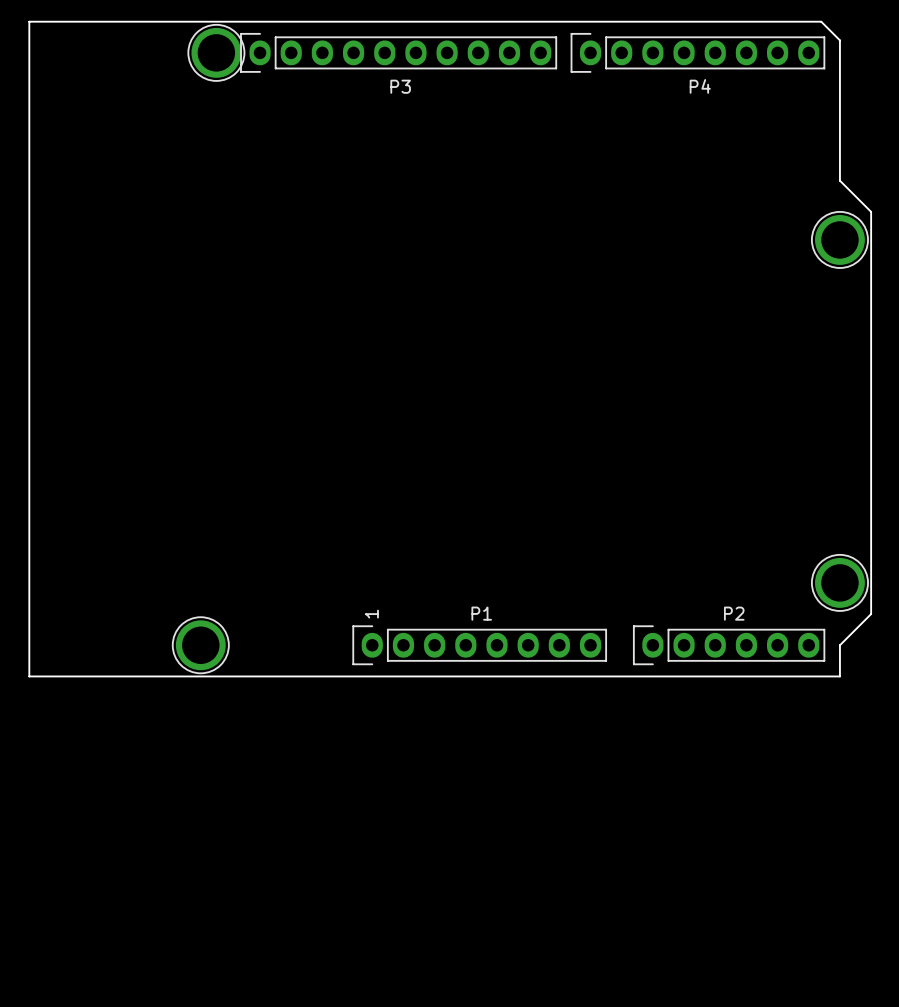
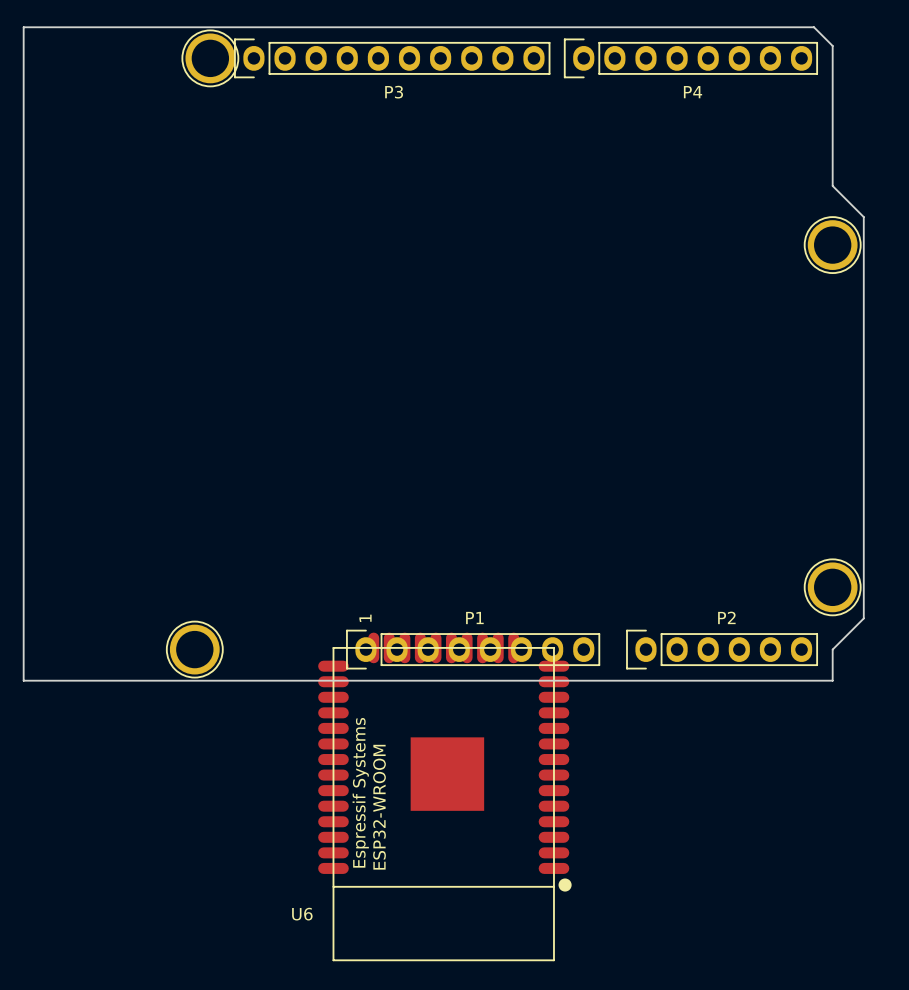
U6: none -> (444, 796)

